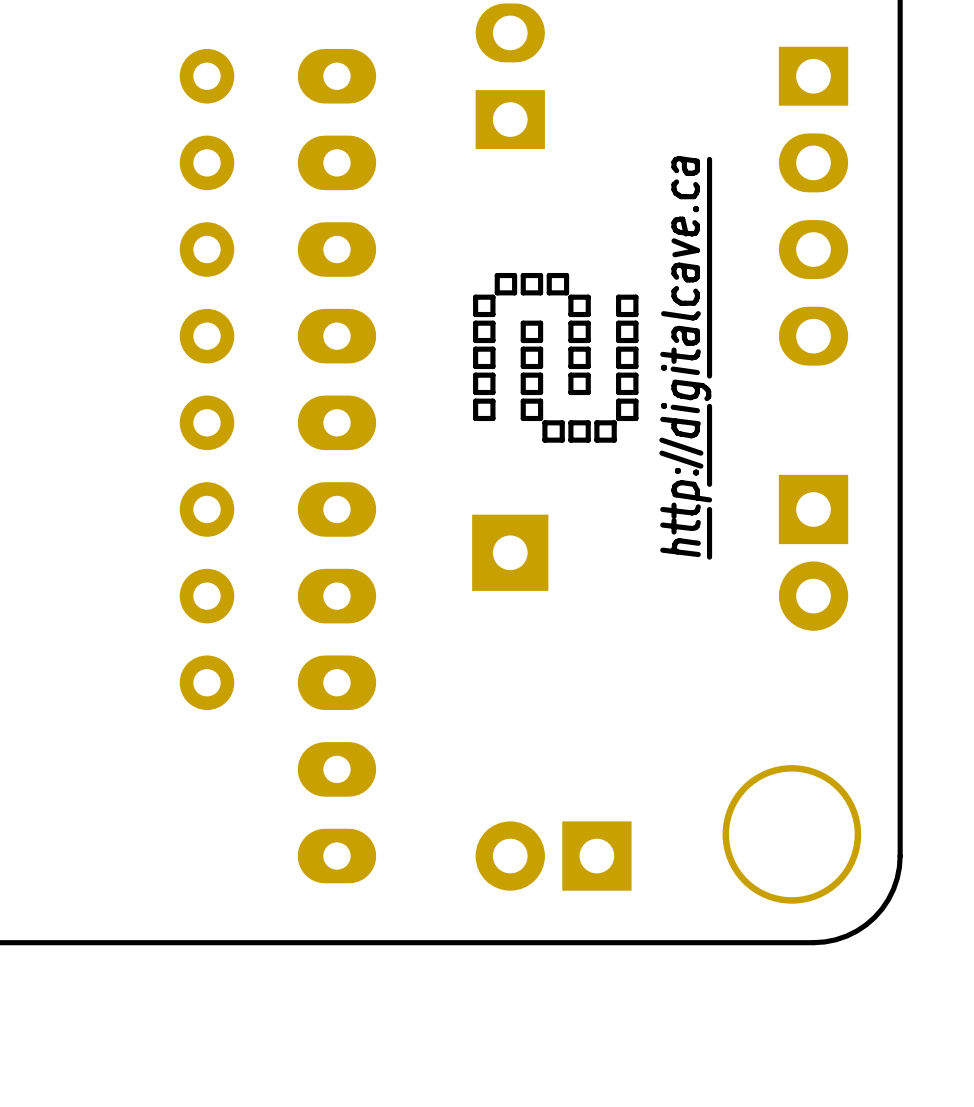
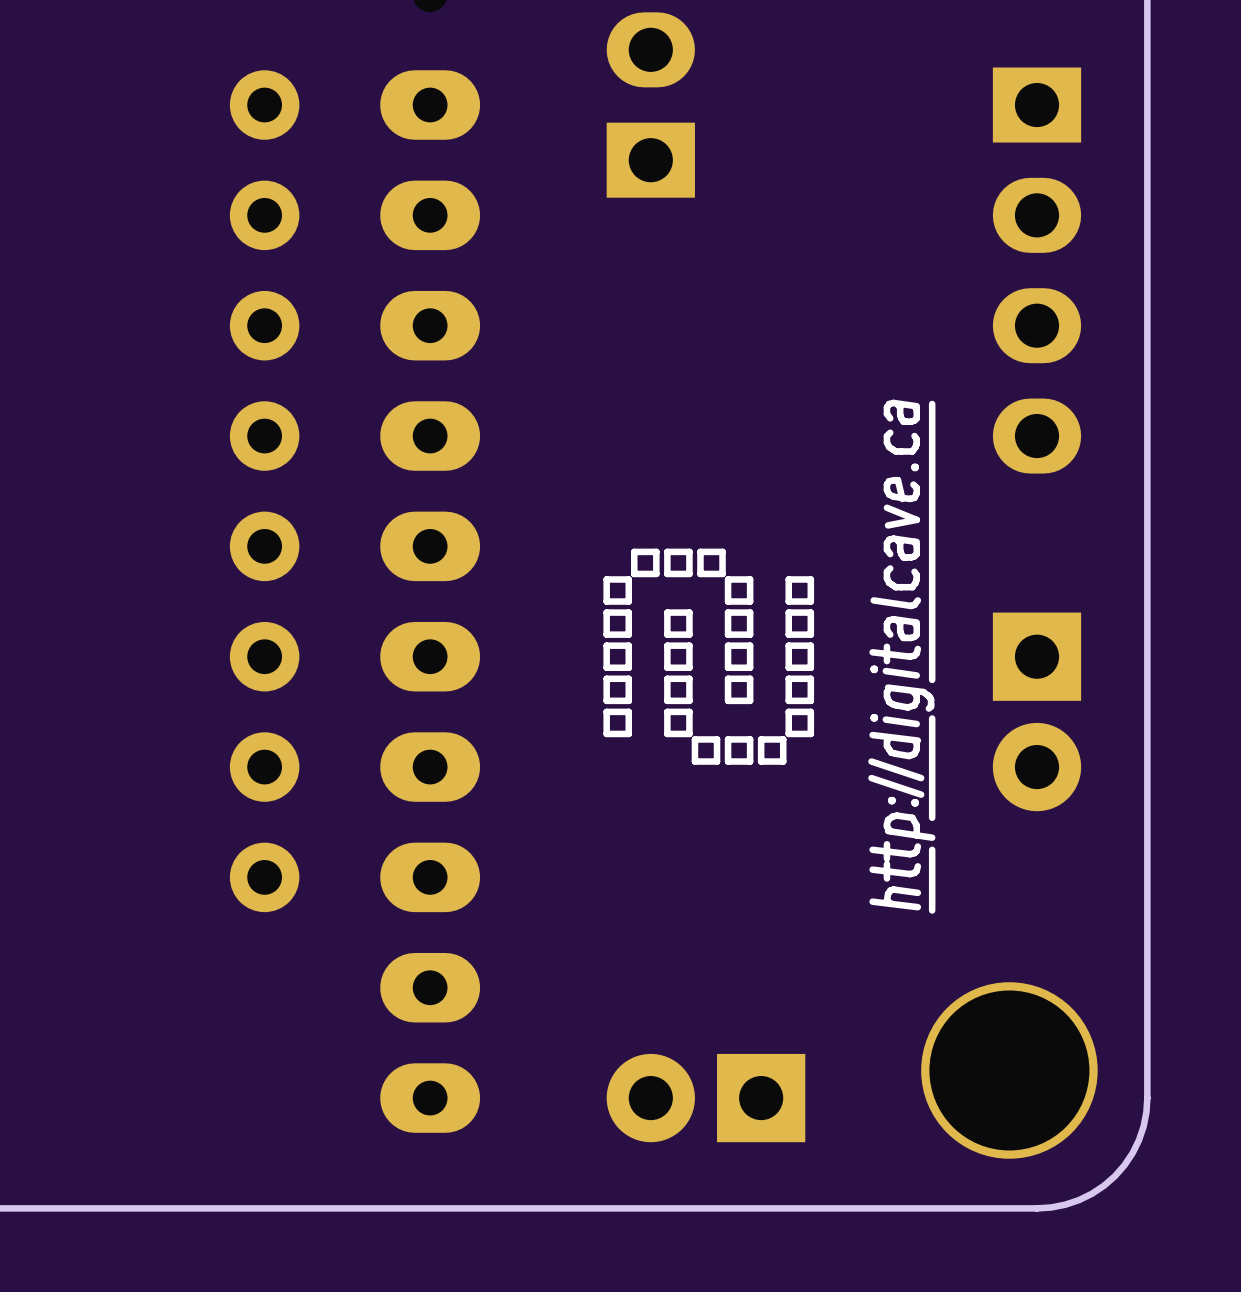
drawing position: (555, 357) -> (708, 656)
drawing position: (685, 357) -> (901, 656)
part: (510, 552) -> none

